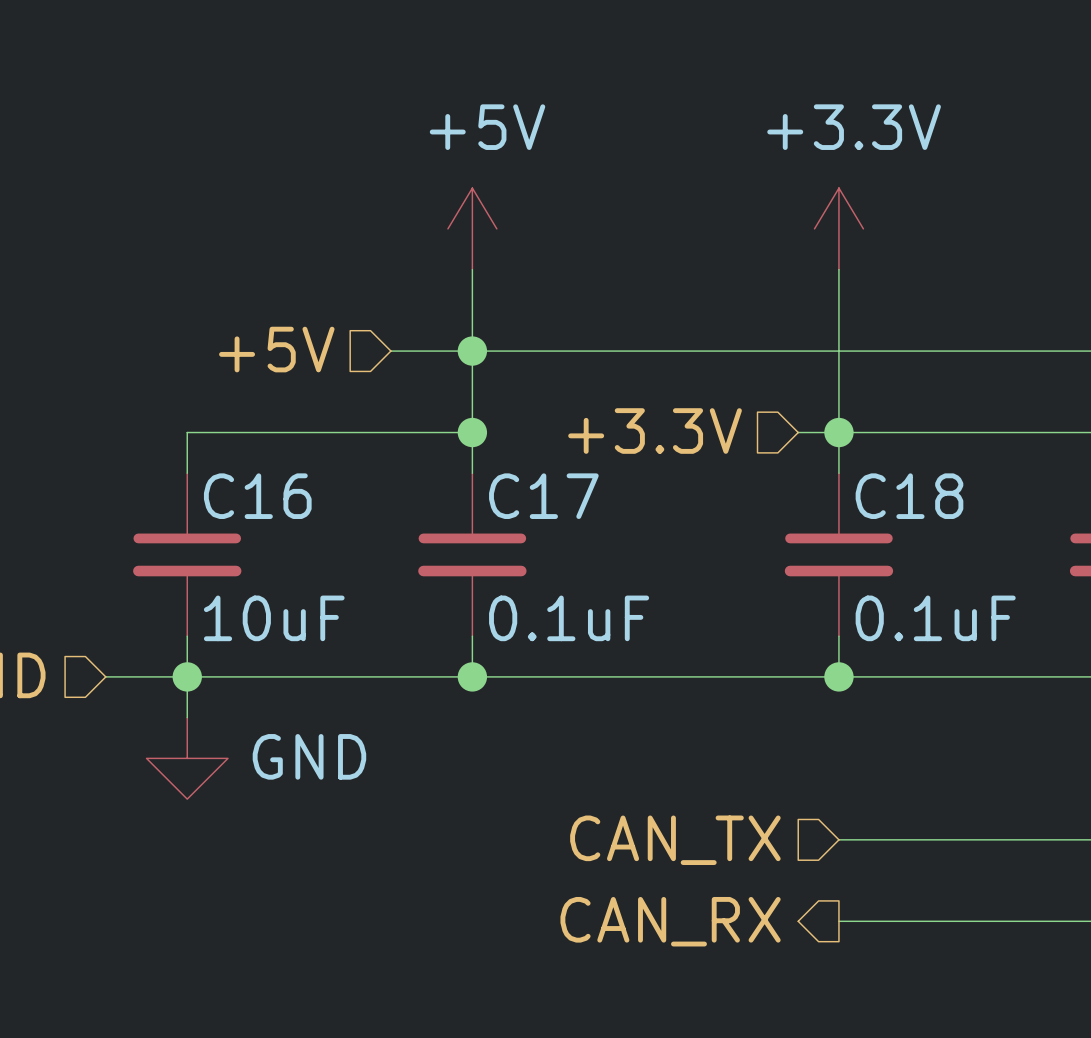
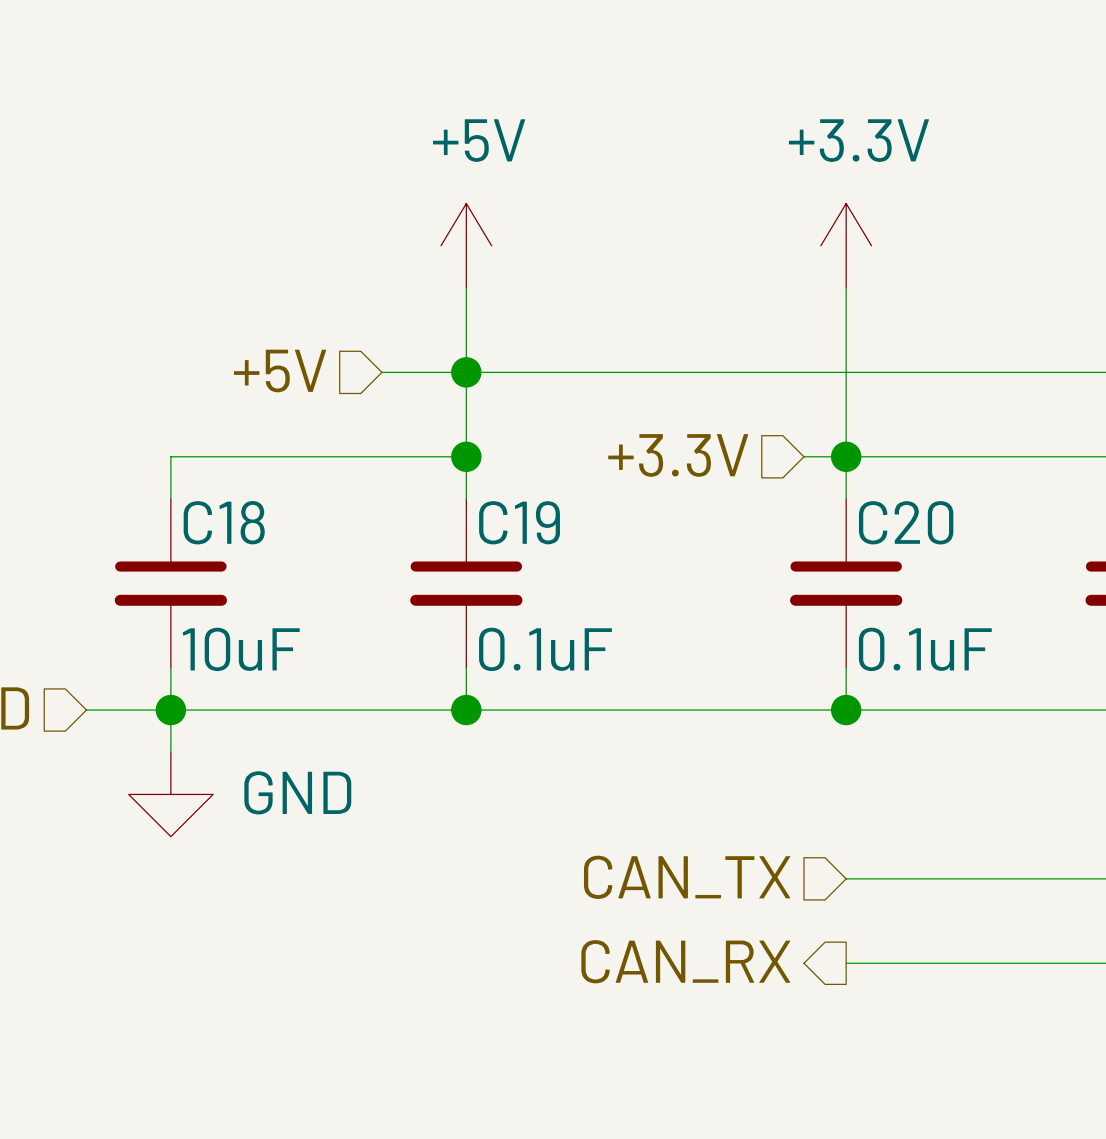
C16 name: C16 (257, 496) -> C18 (224, 522)
C17 name: C17 (543, 496) -> C19 (519, 522)
C18 name: C18 (909, 496) -> C20 (906, 522)

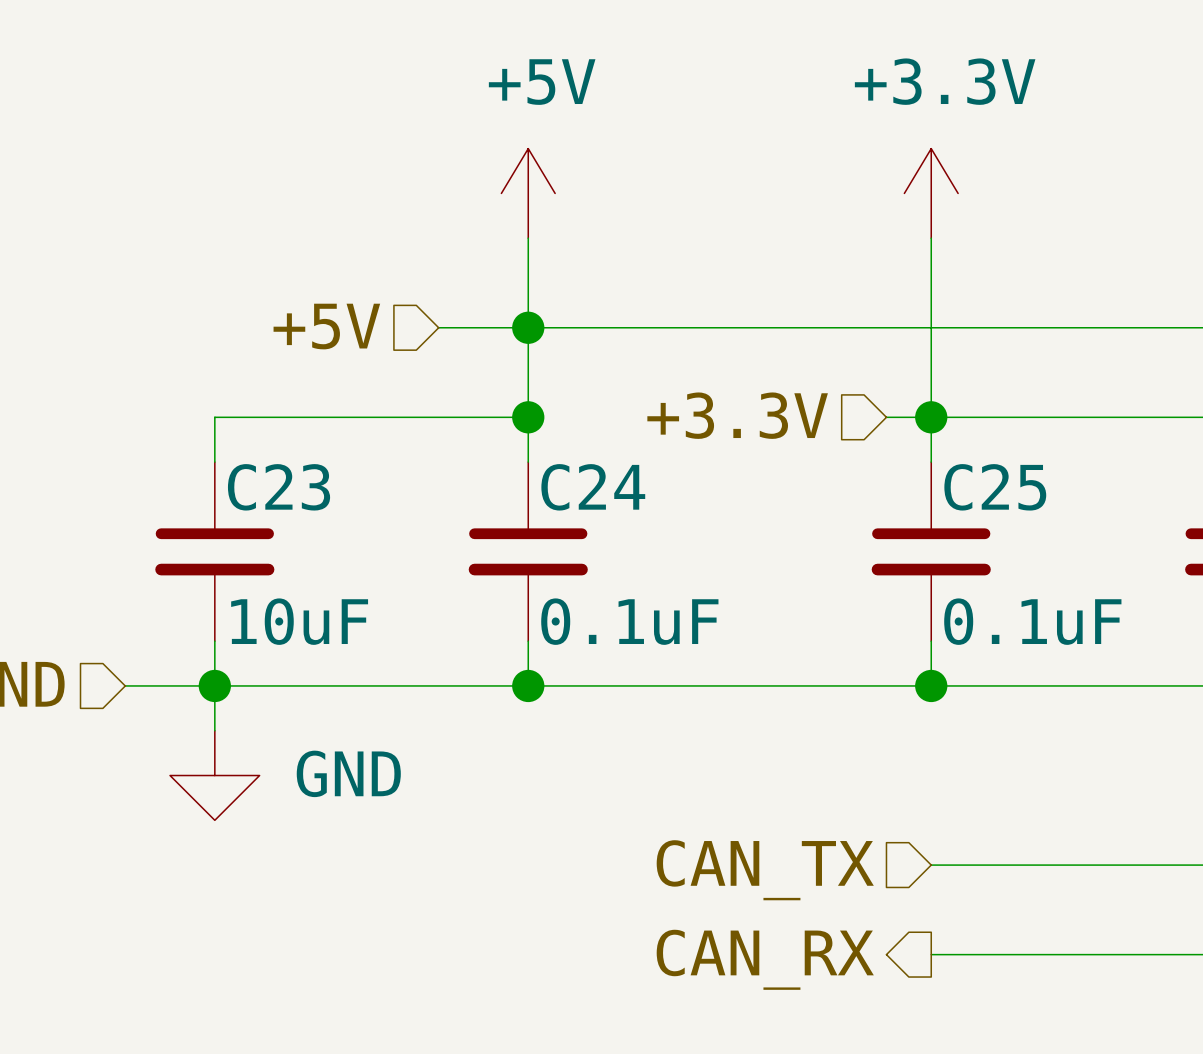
C18 name: C18 (224, 522) -> C23 (279, 487)
C19 name: C19 (519, 522) -> C24 (593, 487)
C20 name: C20 (906, 522) -> C25 (995, 487)

